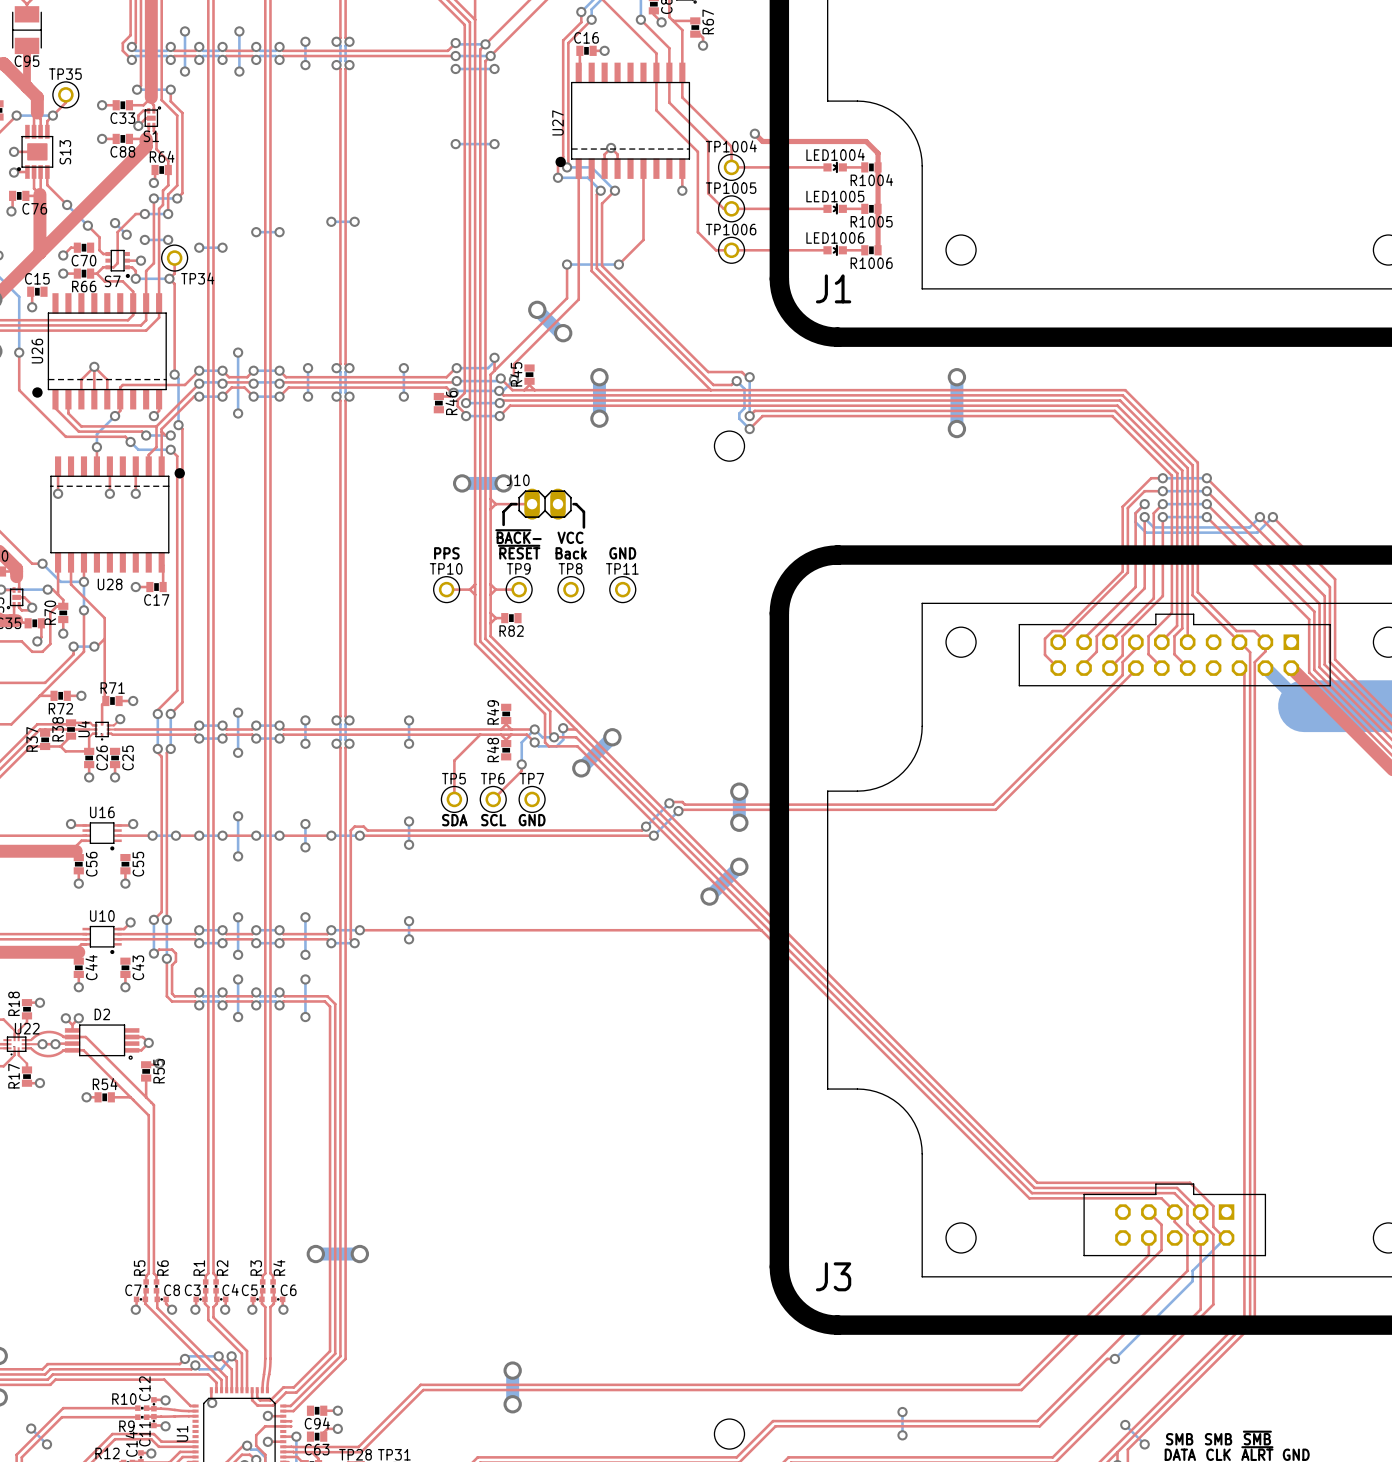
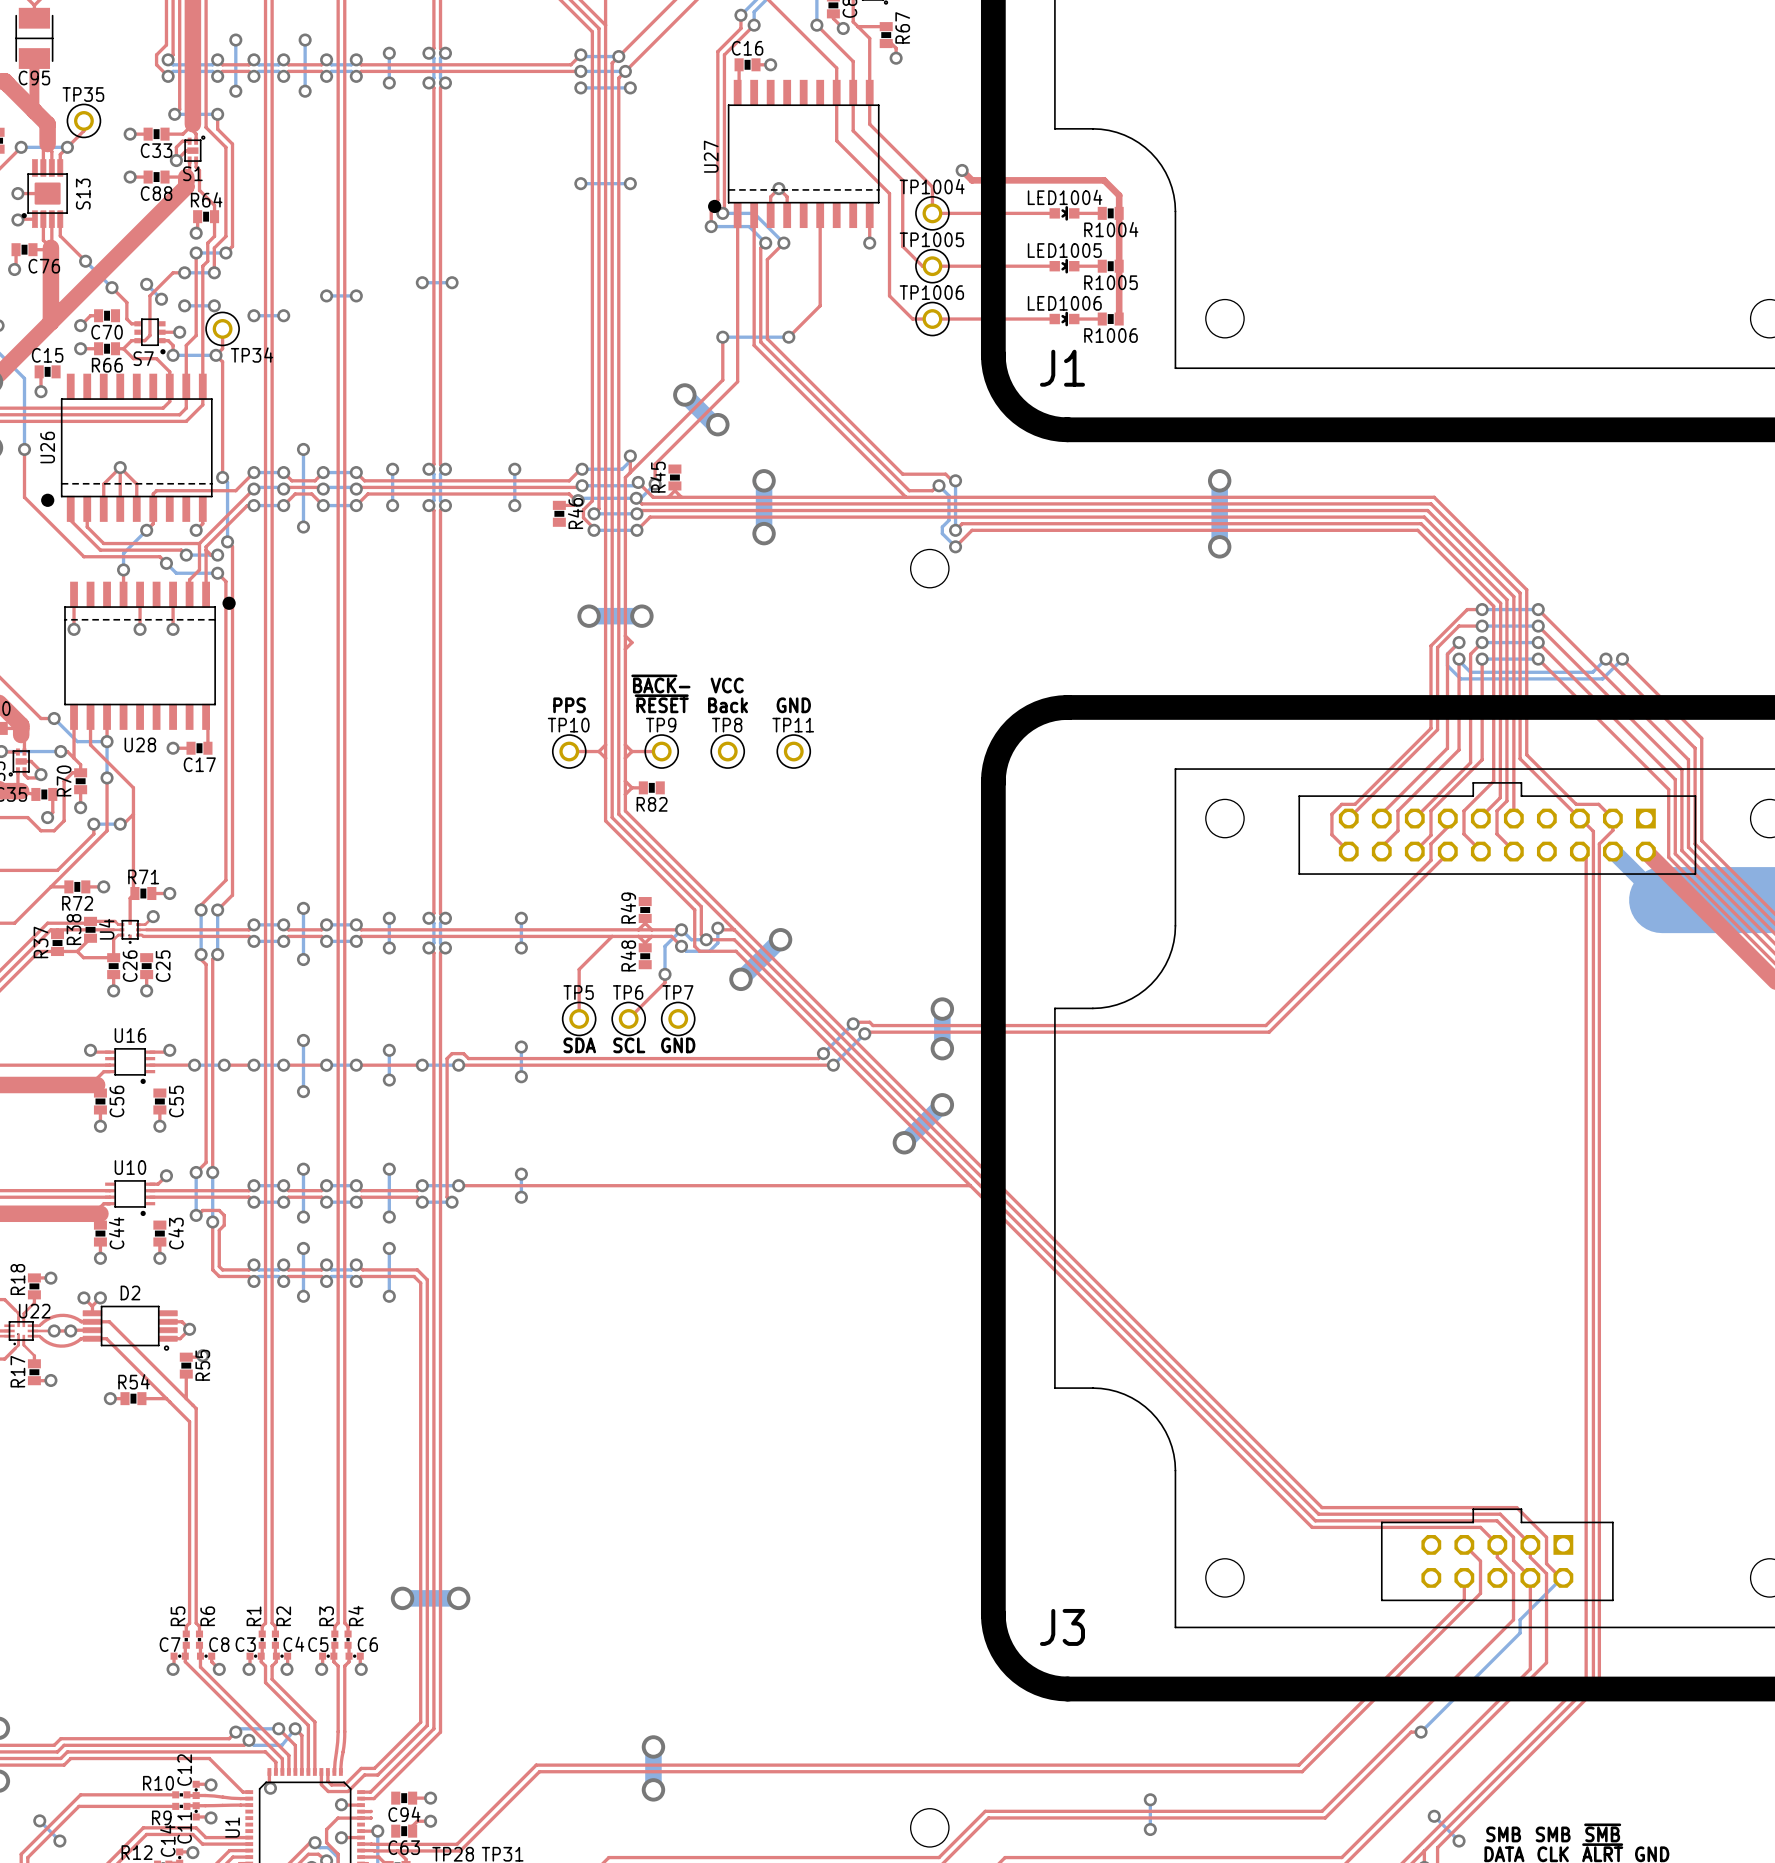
top track: (495, 504) (532, 504) -> none
line: (516, 504) (511, 504) (503, 511) (503, 524) -> none
J10: (545, 504) -> none
line: (573, 504) (576, 504) (583, 511) (583, 527) -> none

